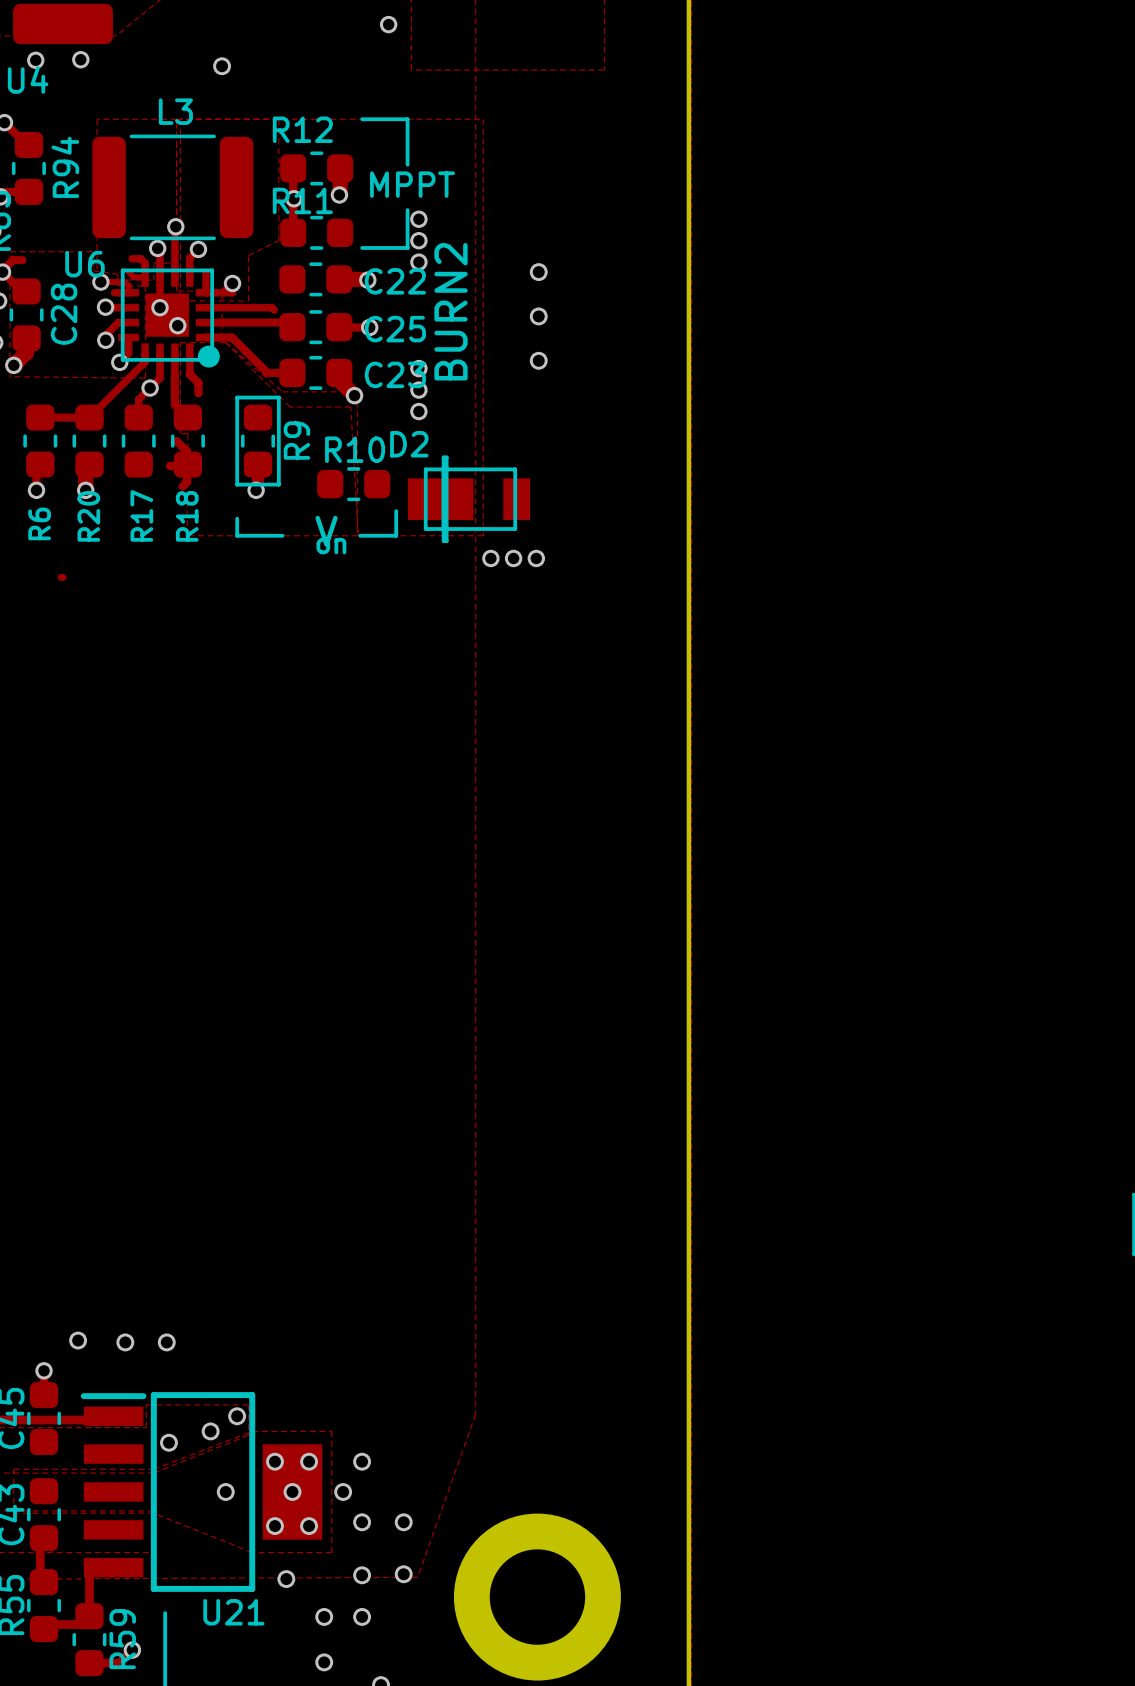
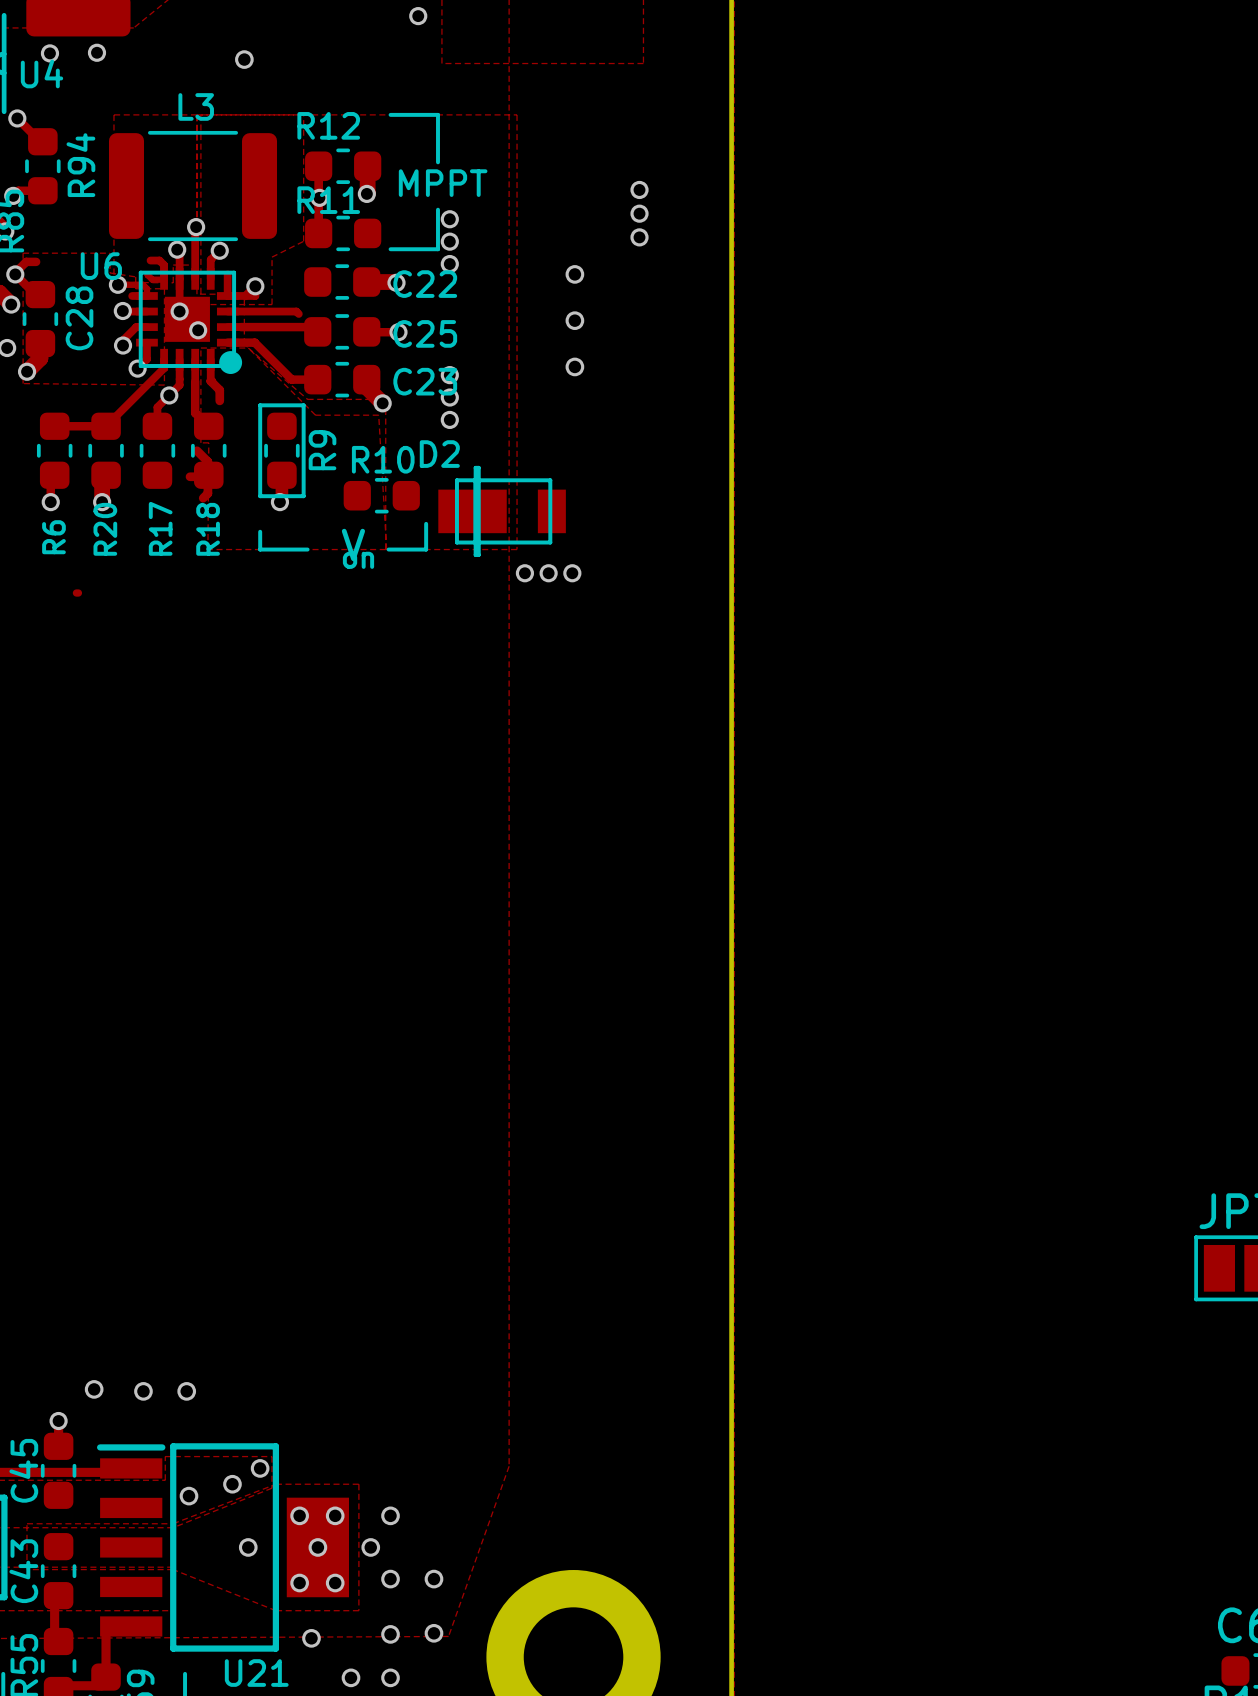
via: none -> (639, 189)
via: none -> (639, 213)
via: none -> (639, 237)
text: BURN2 (451, 311) -> none

